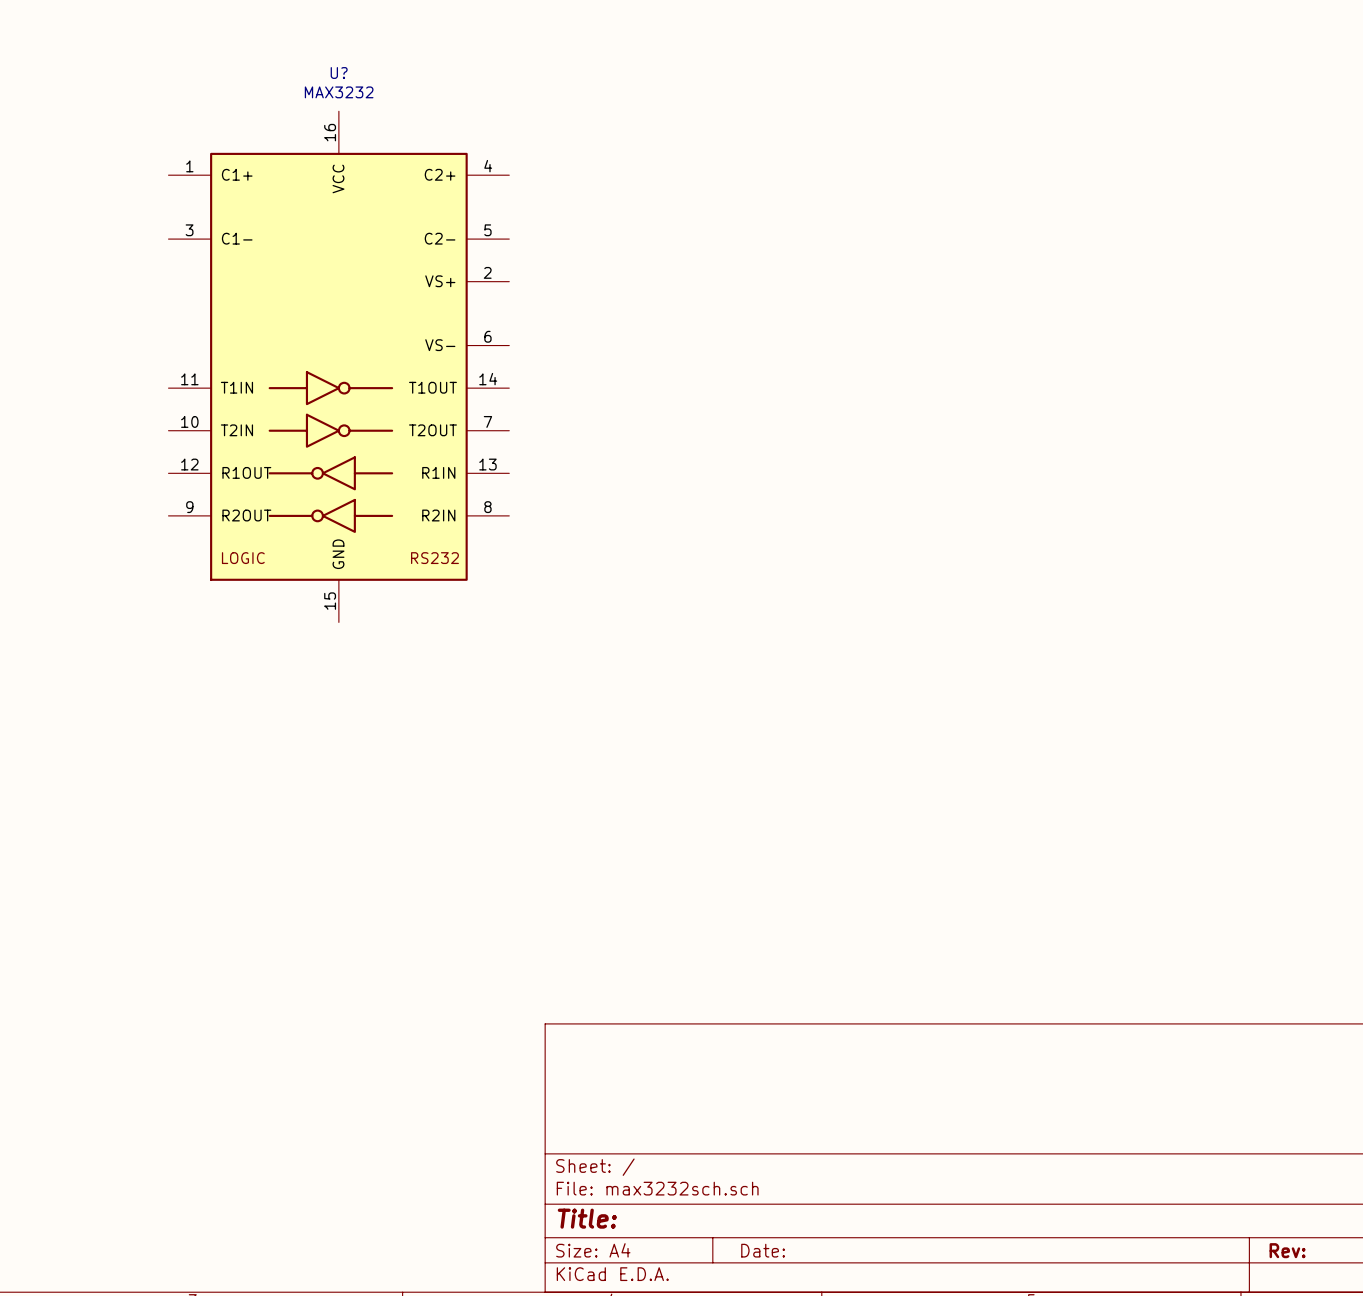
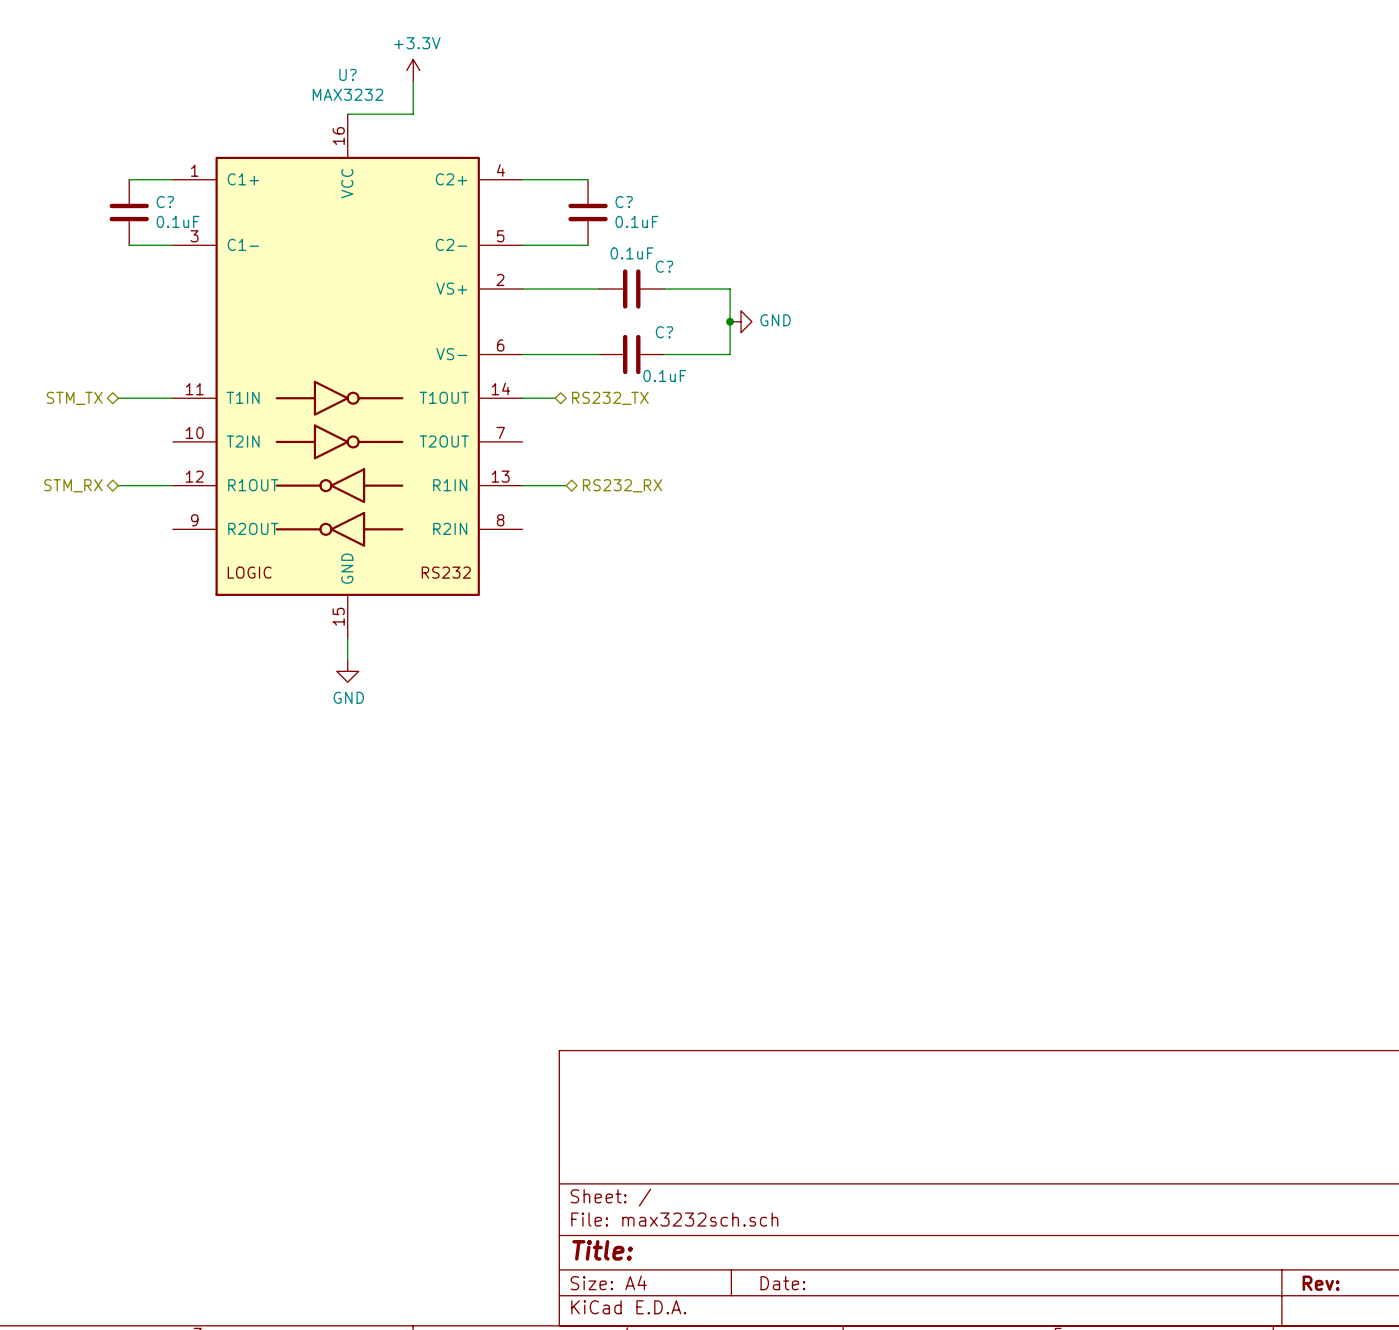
power symbol: none -> +3.3V (413, 70)
wire: none -> (413, 81) (413, 114) (347, 114)
wire: none -> (129, 179) (172, 179)
wire: none -> (522, 179) (588, 179)
C?: none -> 0.1uF (129, 212)
C?: none -> 0.1uF (588, 212)
wire: none -> (129, 245) (172, 245)
wire: none -> (522, 245) (588, 245)
wire: none -> (522, 288) (598, 288)
C?: none -> 0.1uF (631, 288)
wire: none -> (664, 288) (730, 288) (730, 354) (664, 354)
junction: none -> (730, 321)
power symbol: none -> GND (740, 321)
wire: none -> (522, 354) (598, 354)
C?: none -> 0.1uF (631, 354)
hierarchical label: none -> STM_TX (74, 398)
wire: none -> (118, 398) (172, 398)
wire: none -> (522, 398) (555, 398)
hierarchical label: none -> RS232_TX (610, 398)
hierarchical label: none -> STM_RX (73, 485)
wire: none -> (118, 485) (172, 485)
wire: none -> (522, 485) (566, 485)
hierarchical label: none -> RS232_RX (622, 485)
wire: none -> (347, 638) (347, 660)
power symbol: none -> GND (347, 671)

